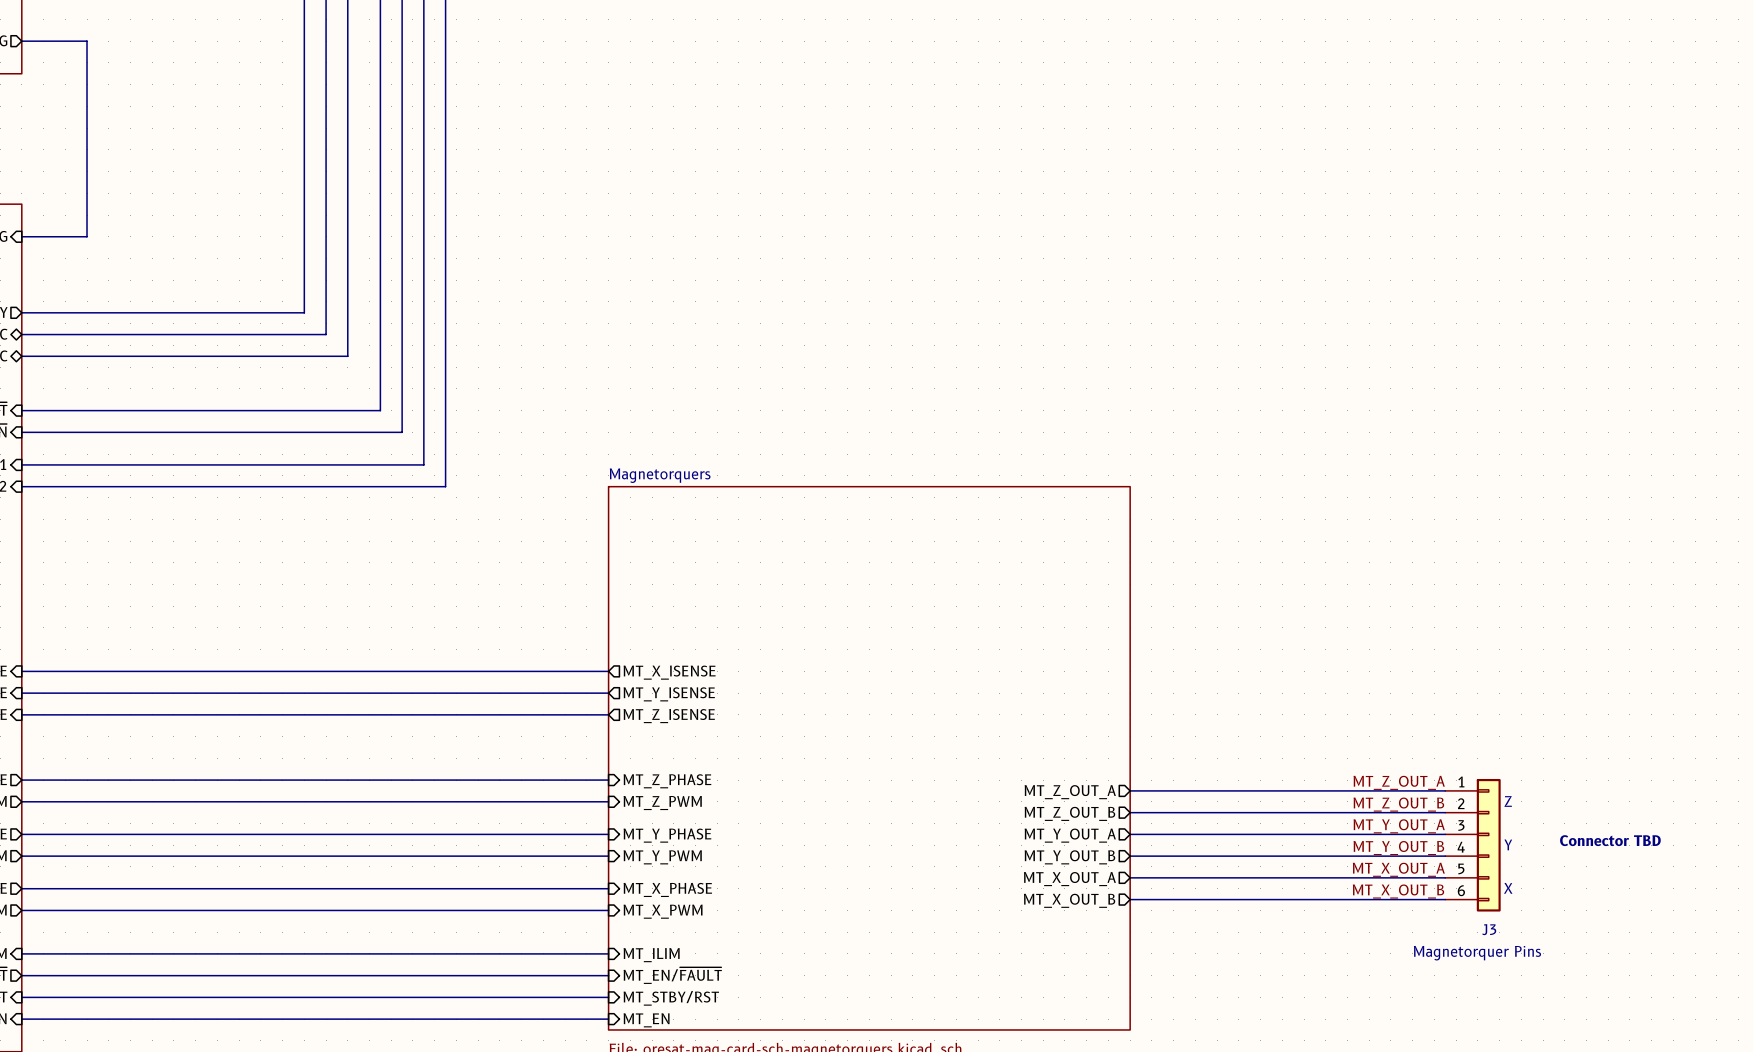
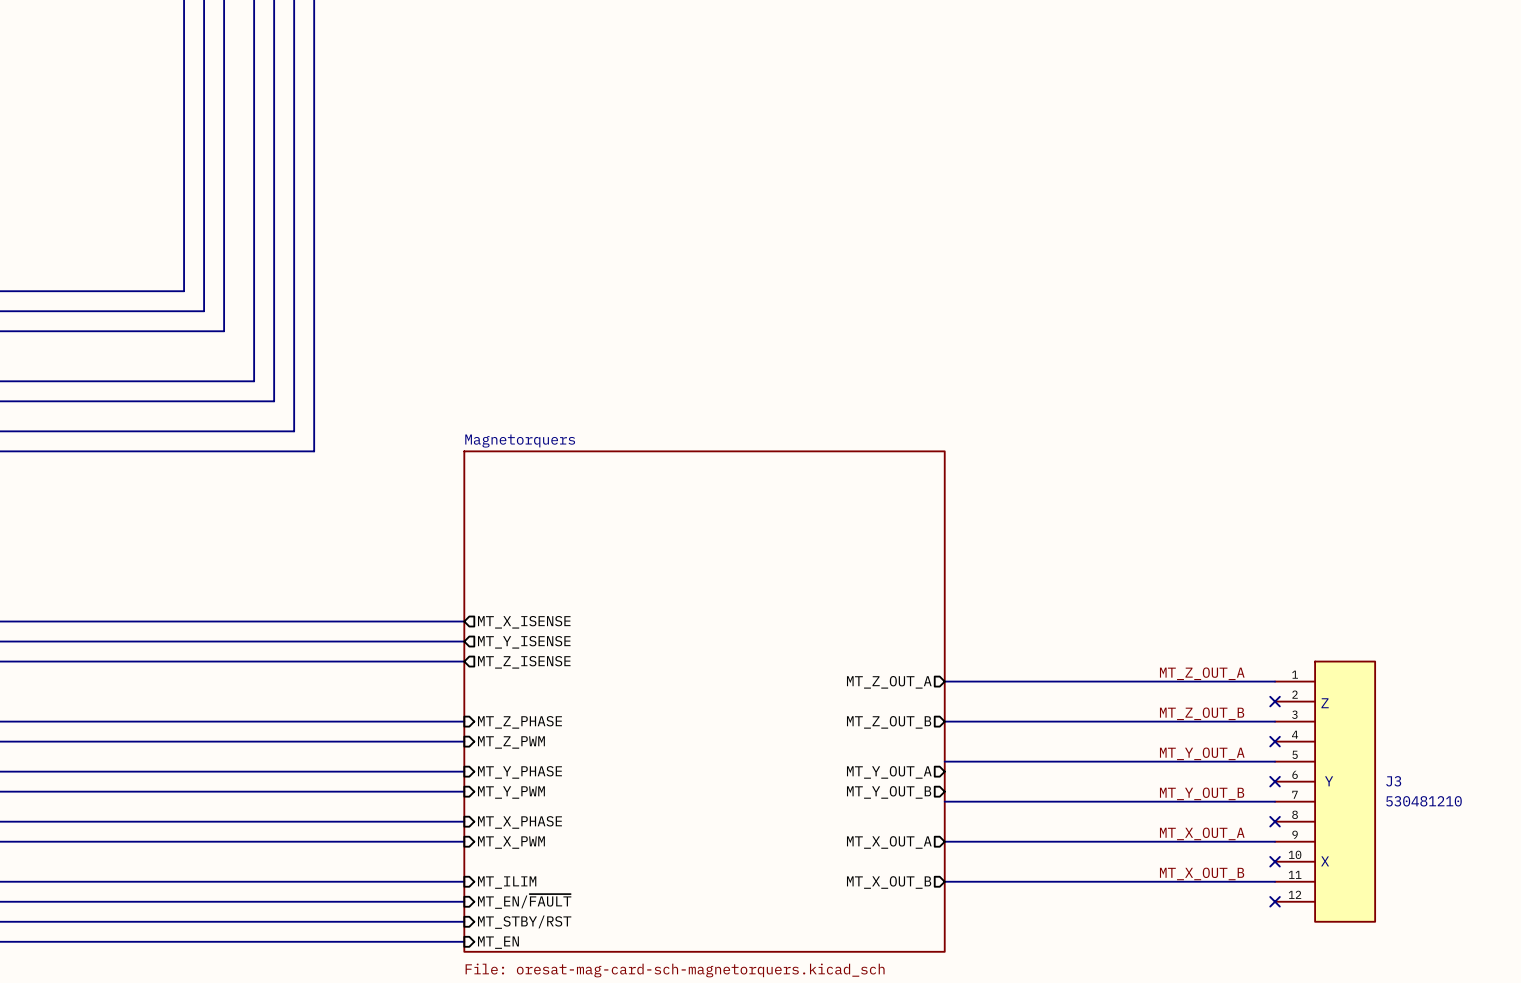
wire: none -> (944, 681) (1275, 681)
no-connect mark: none -> (1275, 701)
J3 symbol: [1445, 778, 1501, 912] -> [1275, 661, 1376, 922]
wire: none -> (944, 721) (1275, 721)
label position: MT_Z_OUT_A (1399, 782) -> MT_Z_OUT_A (1202, 673)
wire: (1130, 790) (1445, 790) -> none
sheet pin position: MT_Z_OUT_A (1070, 792) -> MT_Z_OUT_A (889, 682)
no-connect mark: none -> (1275, 741)
text position: Z (1508, 801) -> Z (1325, 703)
label position: MT_Z_OUT_B (1398, 804) -> MT_Z_OUT_B (1202, 713)
wire: (1130, 812) (1445, 812) -> none
sheet pin position: MT_Z_OUT_B (1069, 813) -> MT_Z_OUT_B (889, 722)
wire: none -> (944, 761) (1275, 761)
label position: MT_Y_OUT_A (1399, 826) -> MT_Y_OUT_A (1202, 753)
wire: (1130, 834) (1445, 834) -> none
text: Connector TBD (1610, 840) -> none
text position: Y (1508, 844) -> Y (1329, 781)
no-connect mark: none -> (1275, 781)
label position: MT_Y_OUT_B (1398, 848) -> MT_Y_OUT_B (1202, 793)
wire: (1130, 856) (1445, 856) -> none
wire: none -> (944, 801) (1275, 801)
label position: MT_X_OUT_A (1398, 869) -> MT_X_OUT_A (1202, 833)
wire: (1130, 877) (1445, 877) -> none
sheet pin position: MT_X_OUT_A (1069, 879) -> MT_X_OUT_A (889, 842)
no-connect mark: none -> (1275, 821)
text position: X (1508, 888) -> X (1325, 861)
label position: MT_X_OUT_B (1398, 891) -> MT_X_OUT_B (1202, 873)
wire: (1130, 899) (1445, 899) -> none
sheet pin position: MT_X_OUT_B (1069, 900) -> MT_X_OUT_B (889, 882)
wire: none -> (944, 841) (1275, 841)
J3 name position: J3 (1489, 929) -> J3 (1393, 781)
no-connect mark: none -> (1275, 861)
wire: none -> (944, 881) (1275, 881)
J3 value: Magnetorquer Pins (1477, 953) -> 530481210 (1423, 801)
no-connect mark: none -> (1275, 901)

